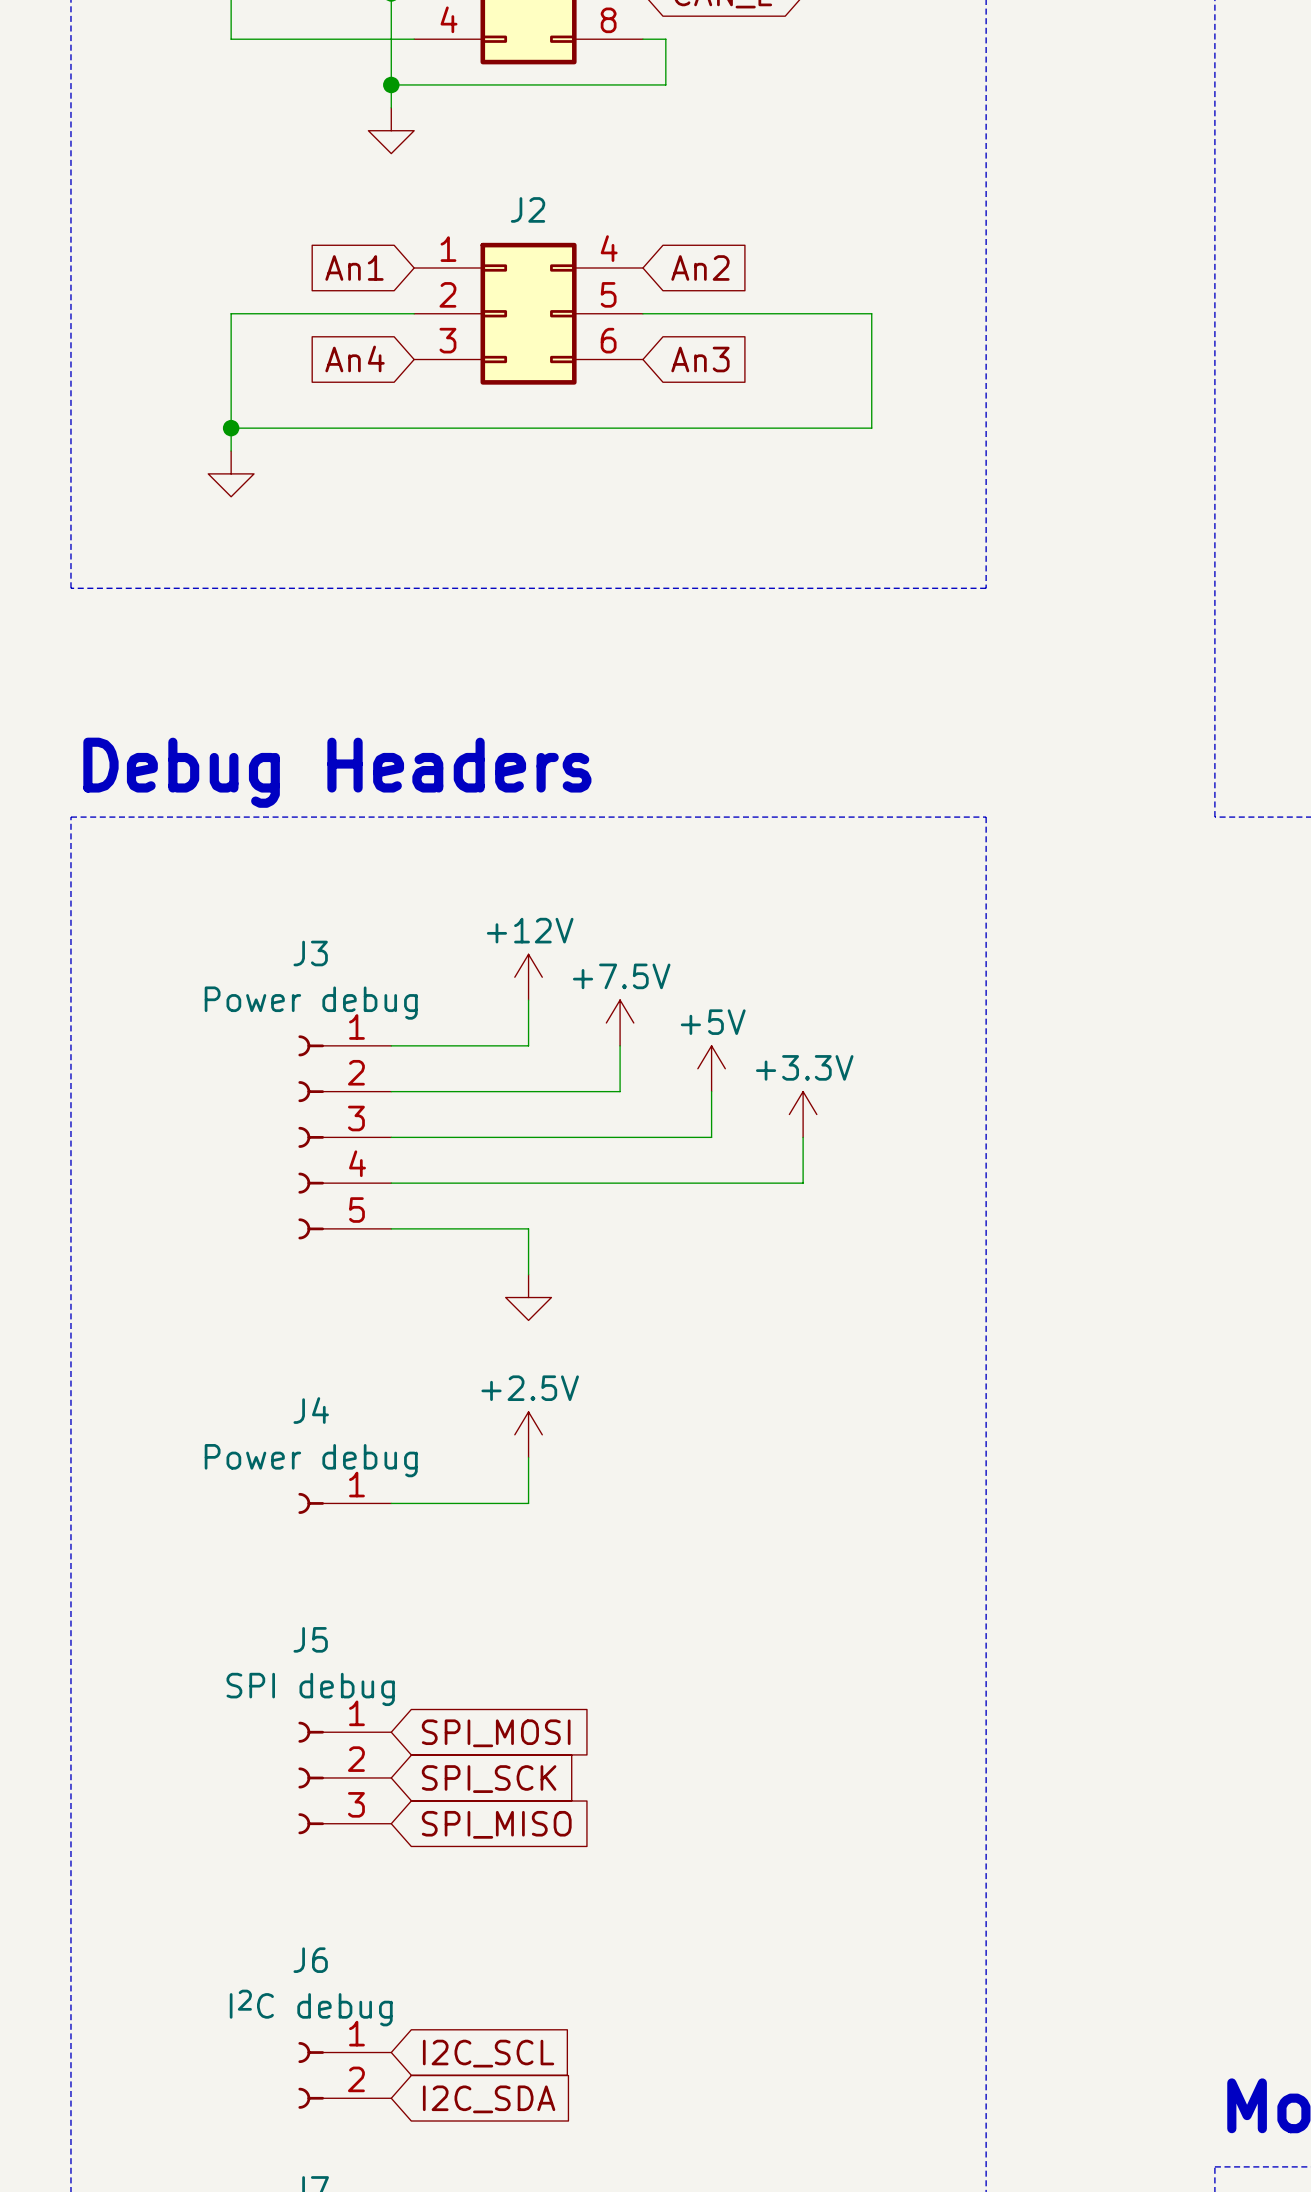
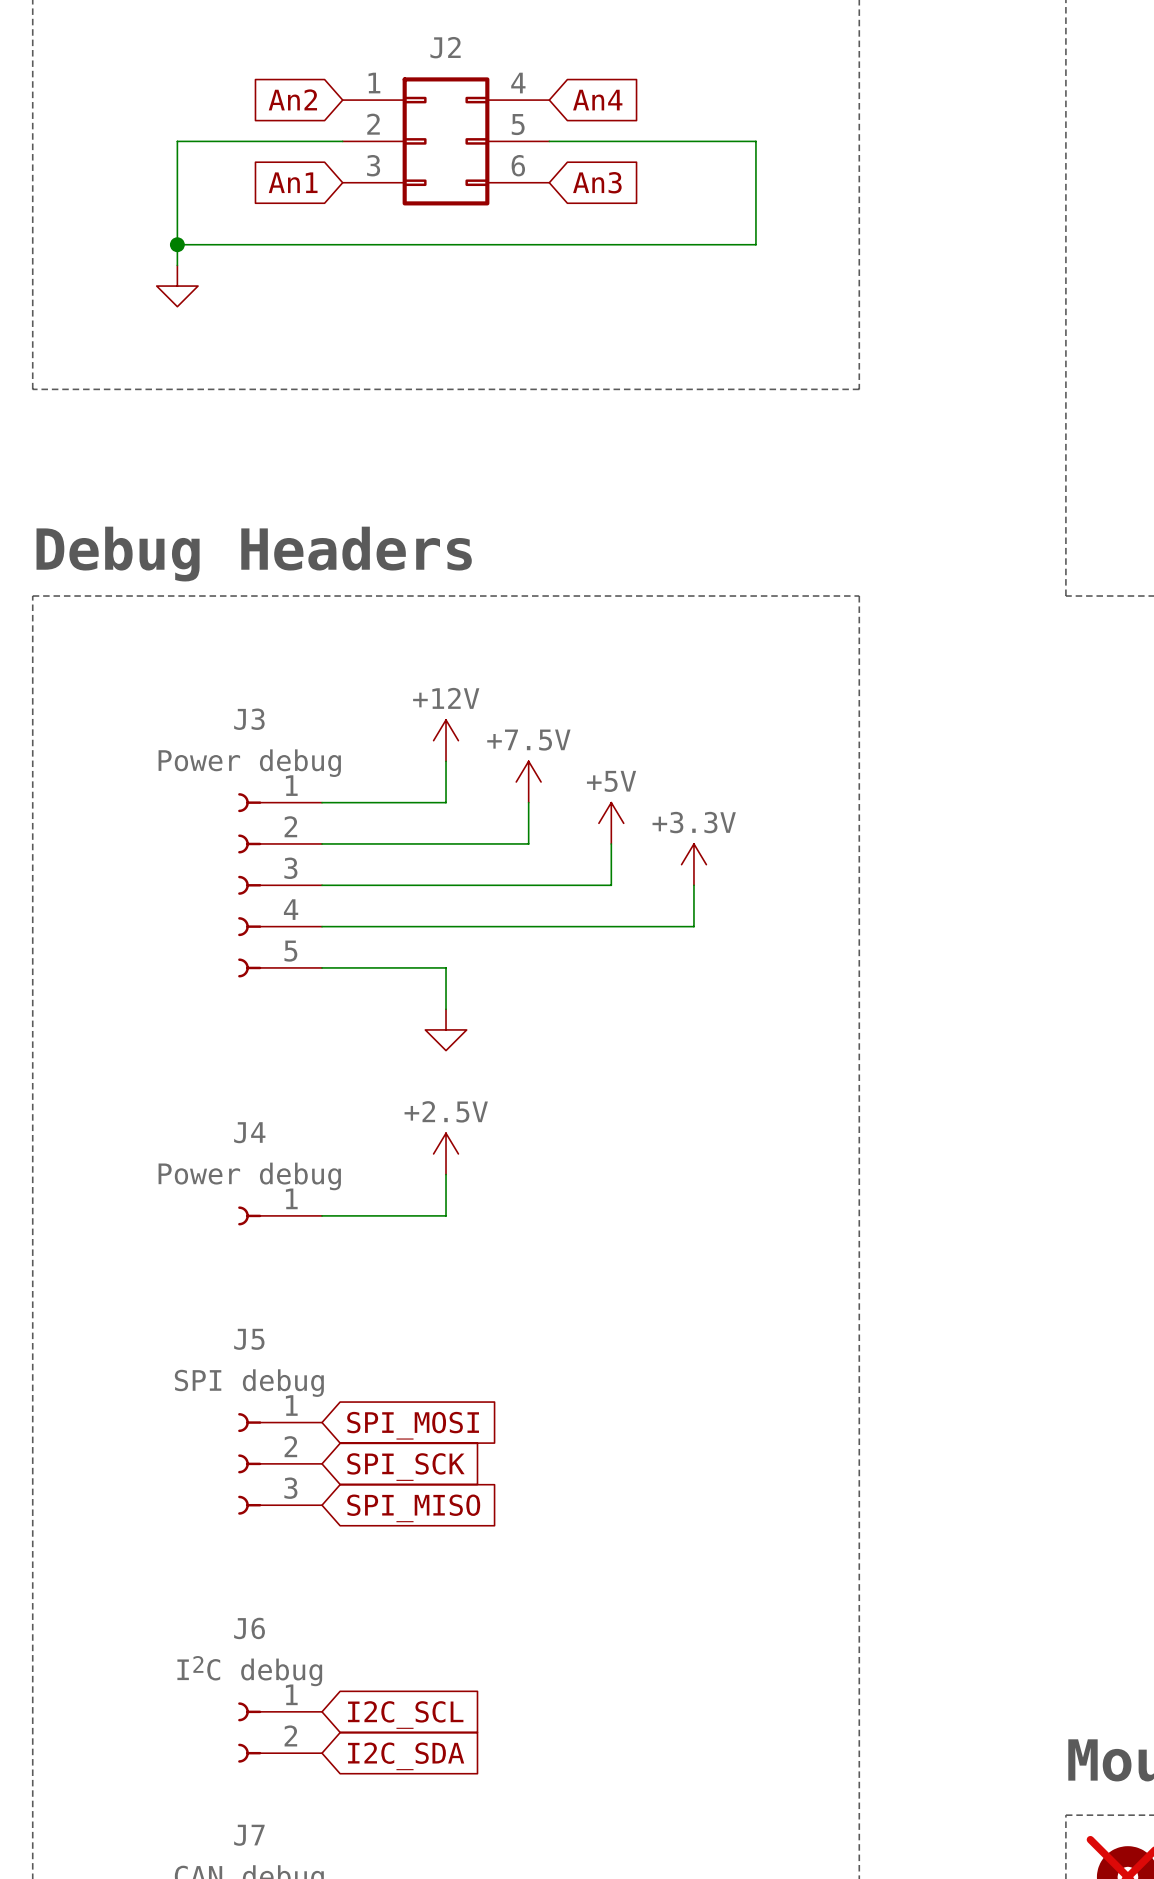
global label: An1 (354, 267) -> An2 (292, 99)
global label: An2 (700, 267) -> An4 (597, 100)
global label: An4 (355, 358) -> An1 (293, 182)

